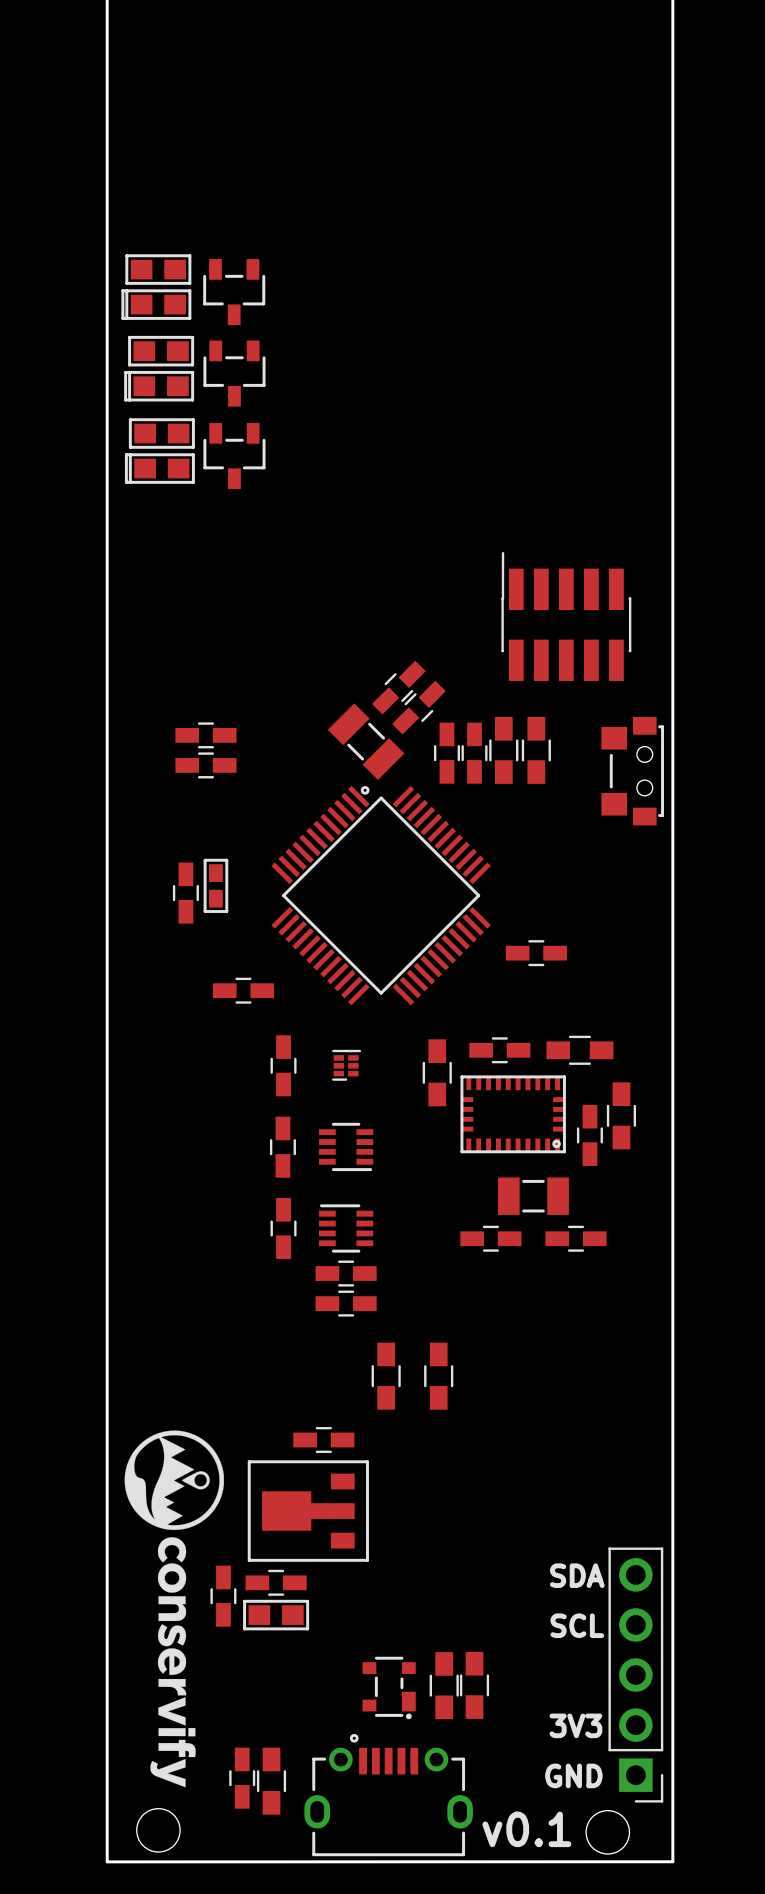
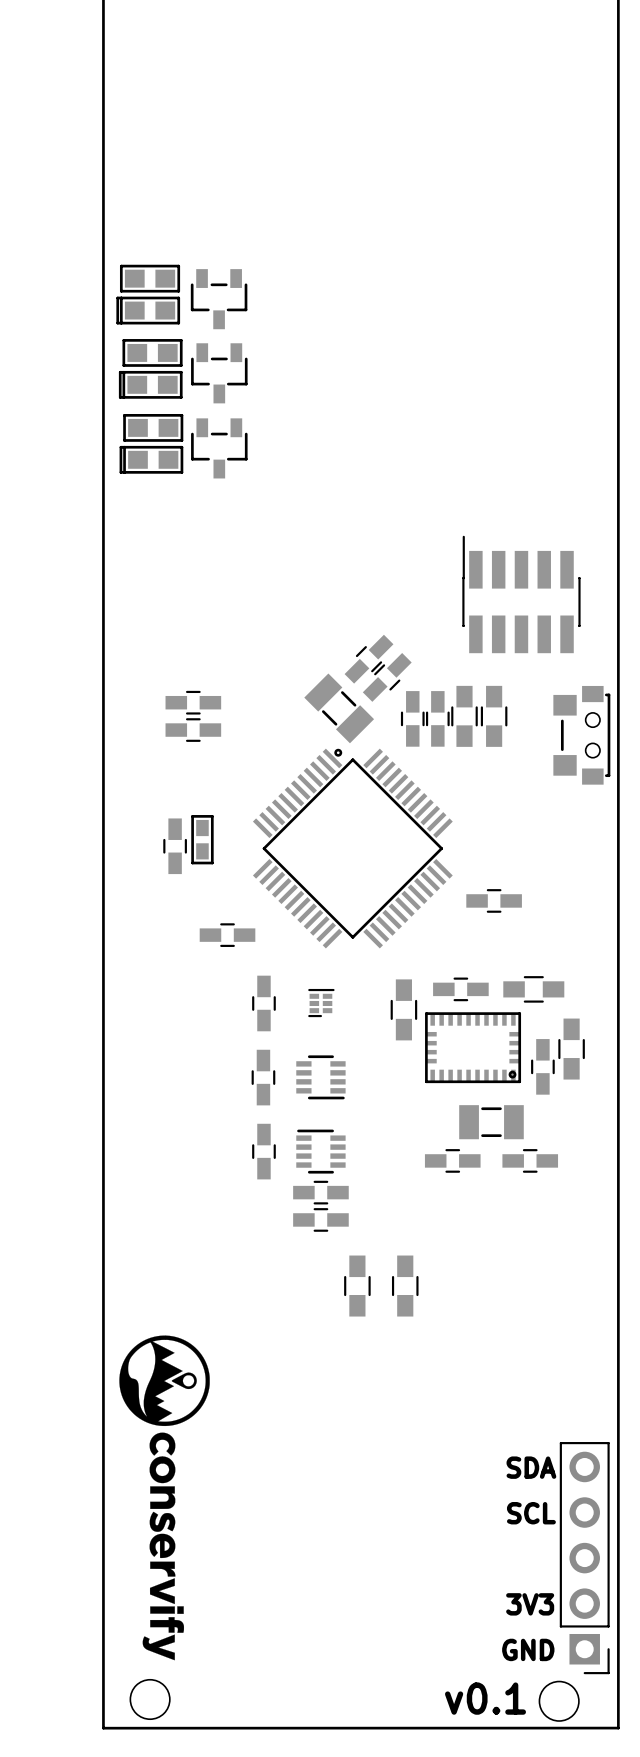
part: (323, 1439) -> none
part: (308, 1511) -> none
part: (276, 1582) -> none
part: (223, 1596) -> none
part: (276, 1615) -> none
part: (444, 1685) -> none
part: (474, 1685) -> none
part: (389, 1687) -> none
part: (242, 1778) -> none
part: (271, 1781) -> none
part: (388, 1795) -> none

